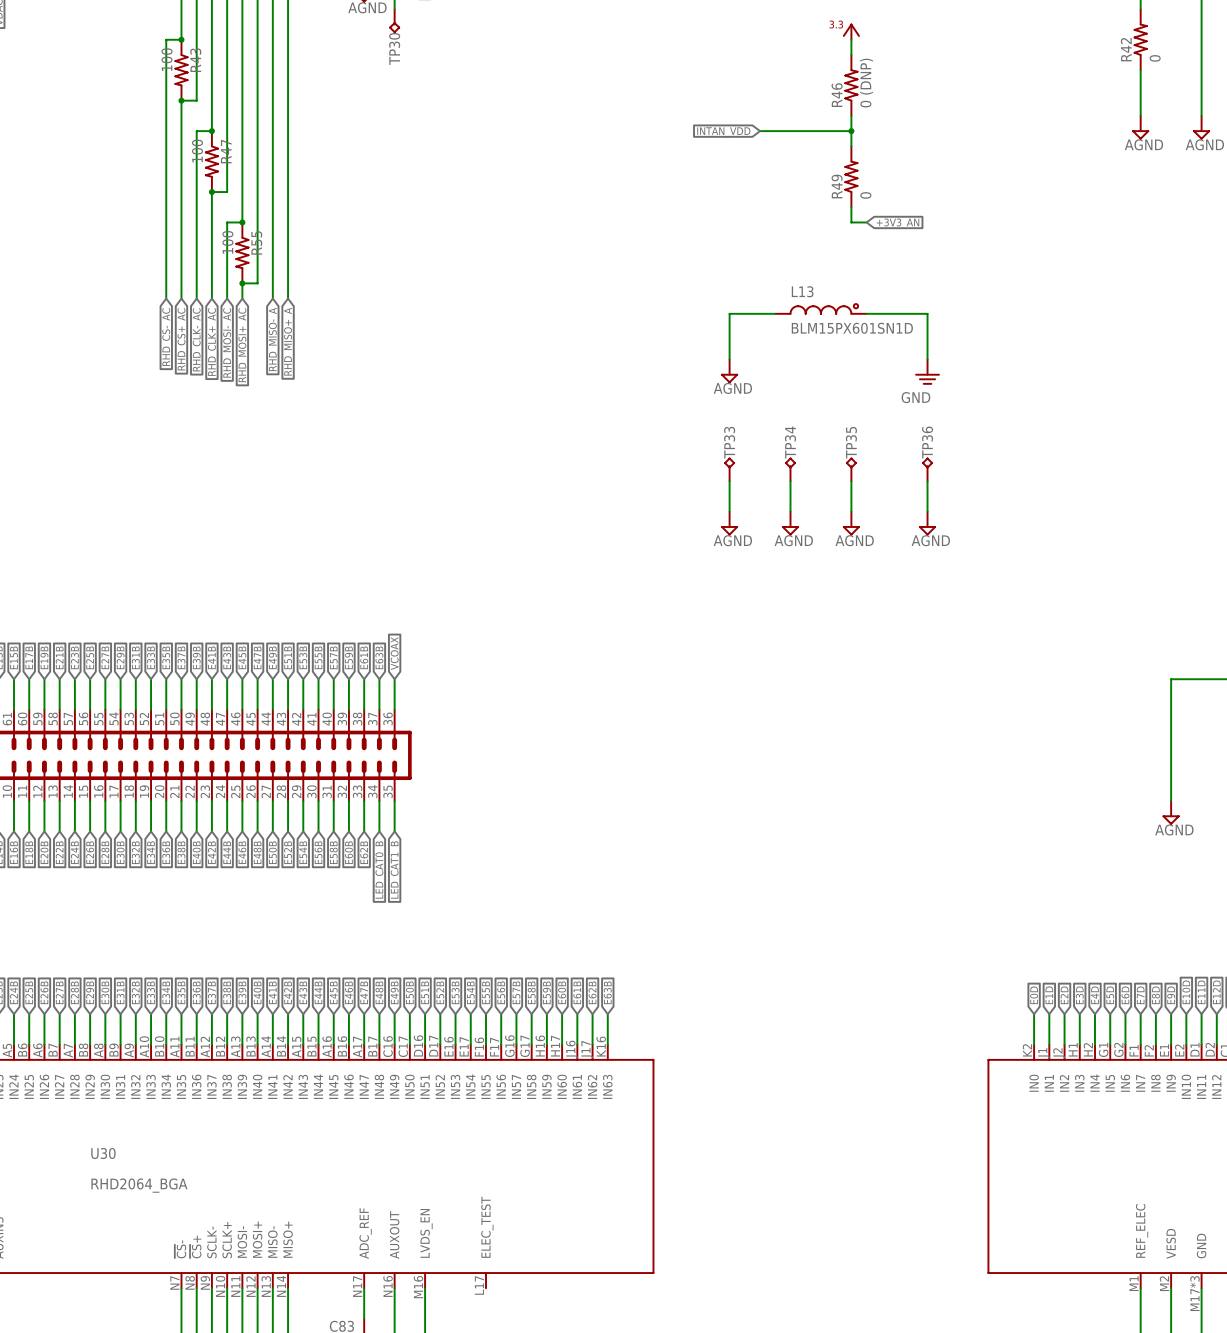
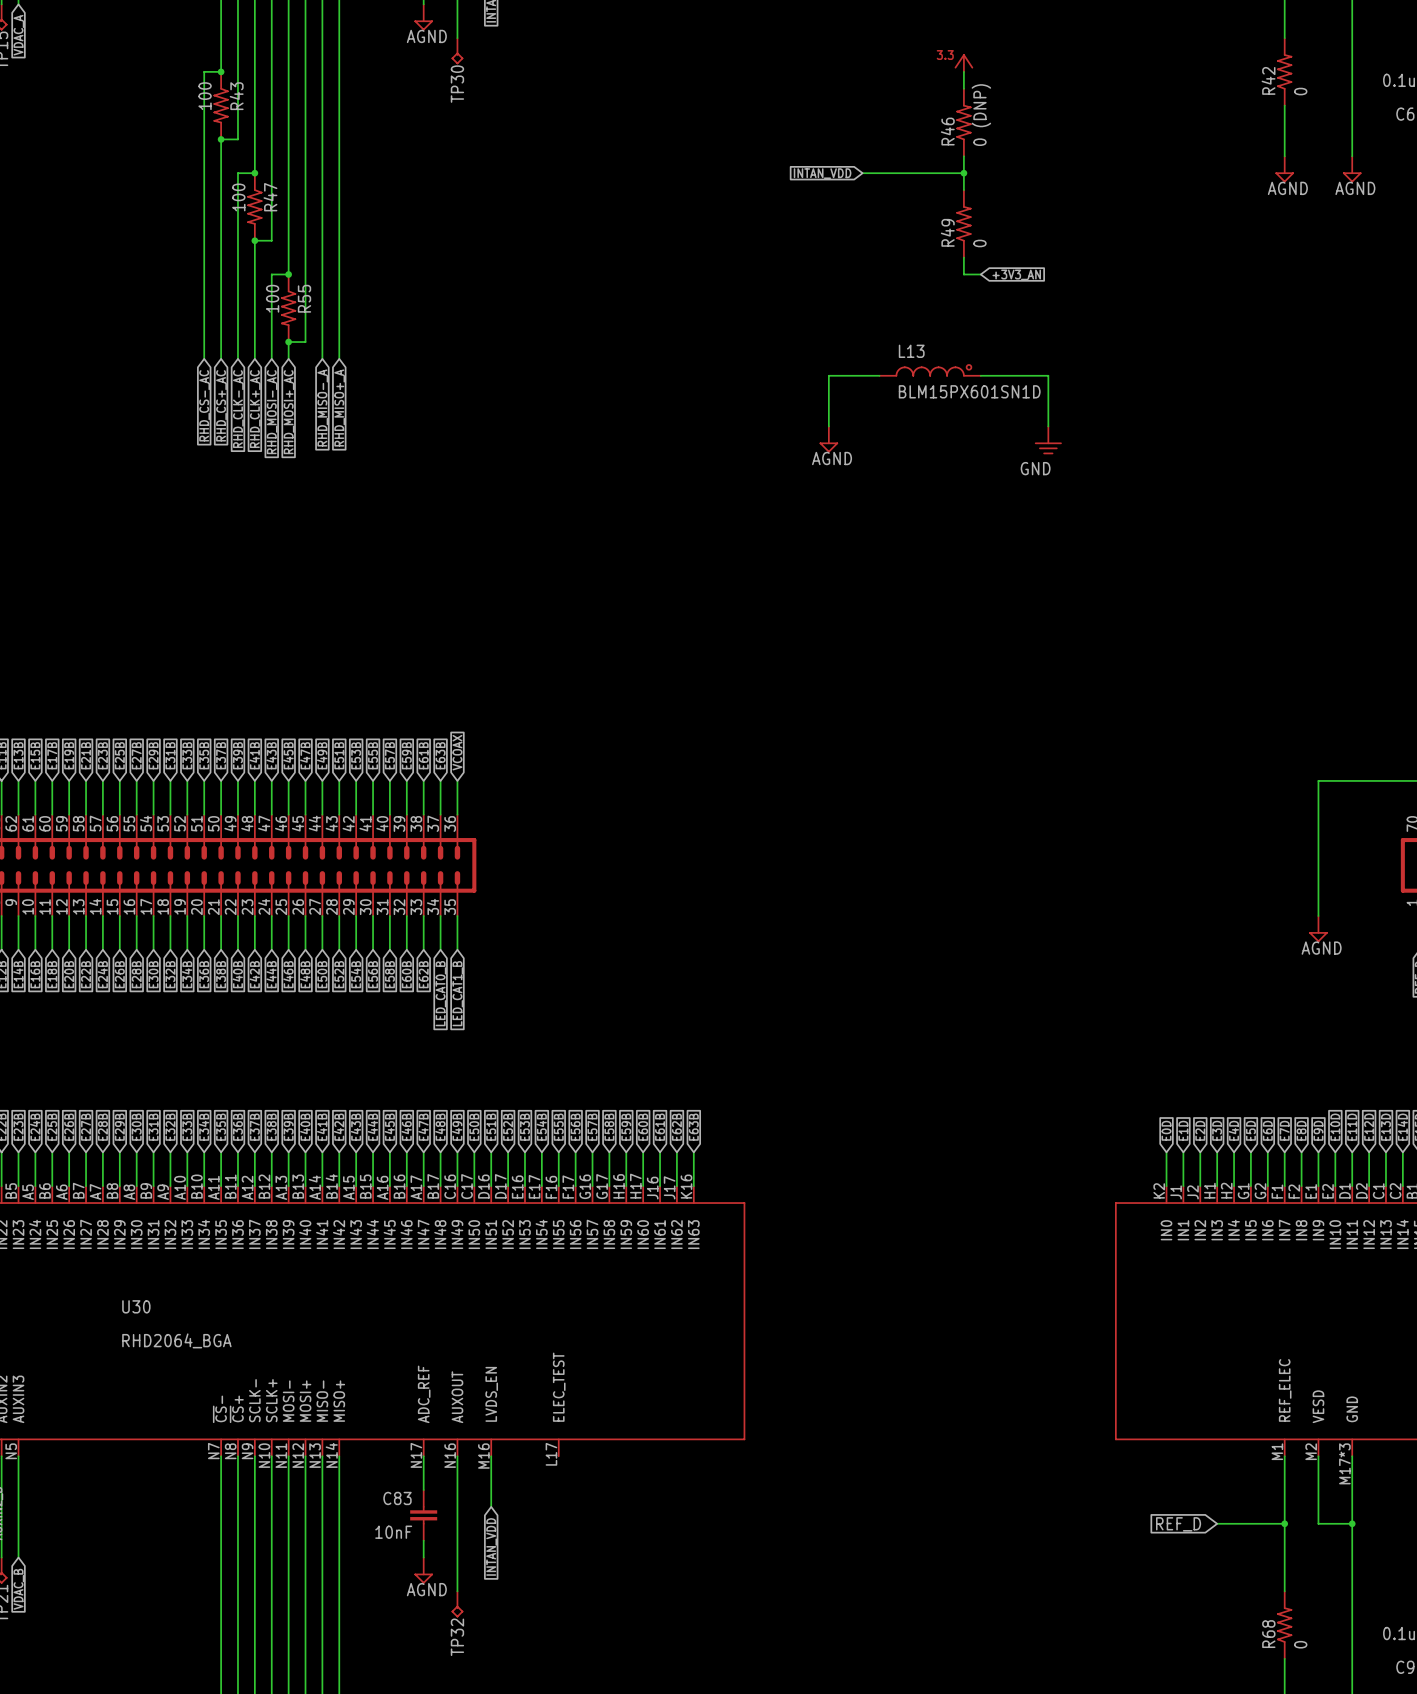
TP33: (729, 469) -> none
TP34: (790, 469) -> none
TP35: (851, 469) -> none
TP36: (927, 469) -> none
wire: (729, 481) (729, 511) -> none
wire: (790, 481) (790, 511) -> none
wire: (851, 481) (851, 511) -> none
wire: (927, 481) (927, 511) -> none
power symbol: AGND (729, 523) -> none
power symbol: AGND (790, 523) -> none
power symbol: AGND (851, 523) -> none
power symbol: AGND (927, 523) -> none

